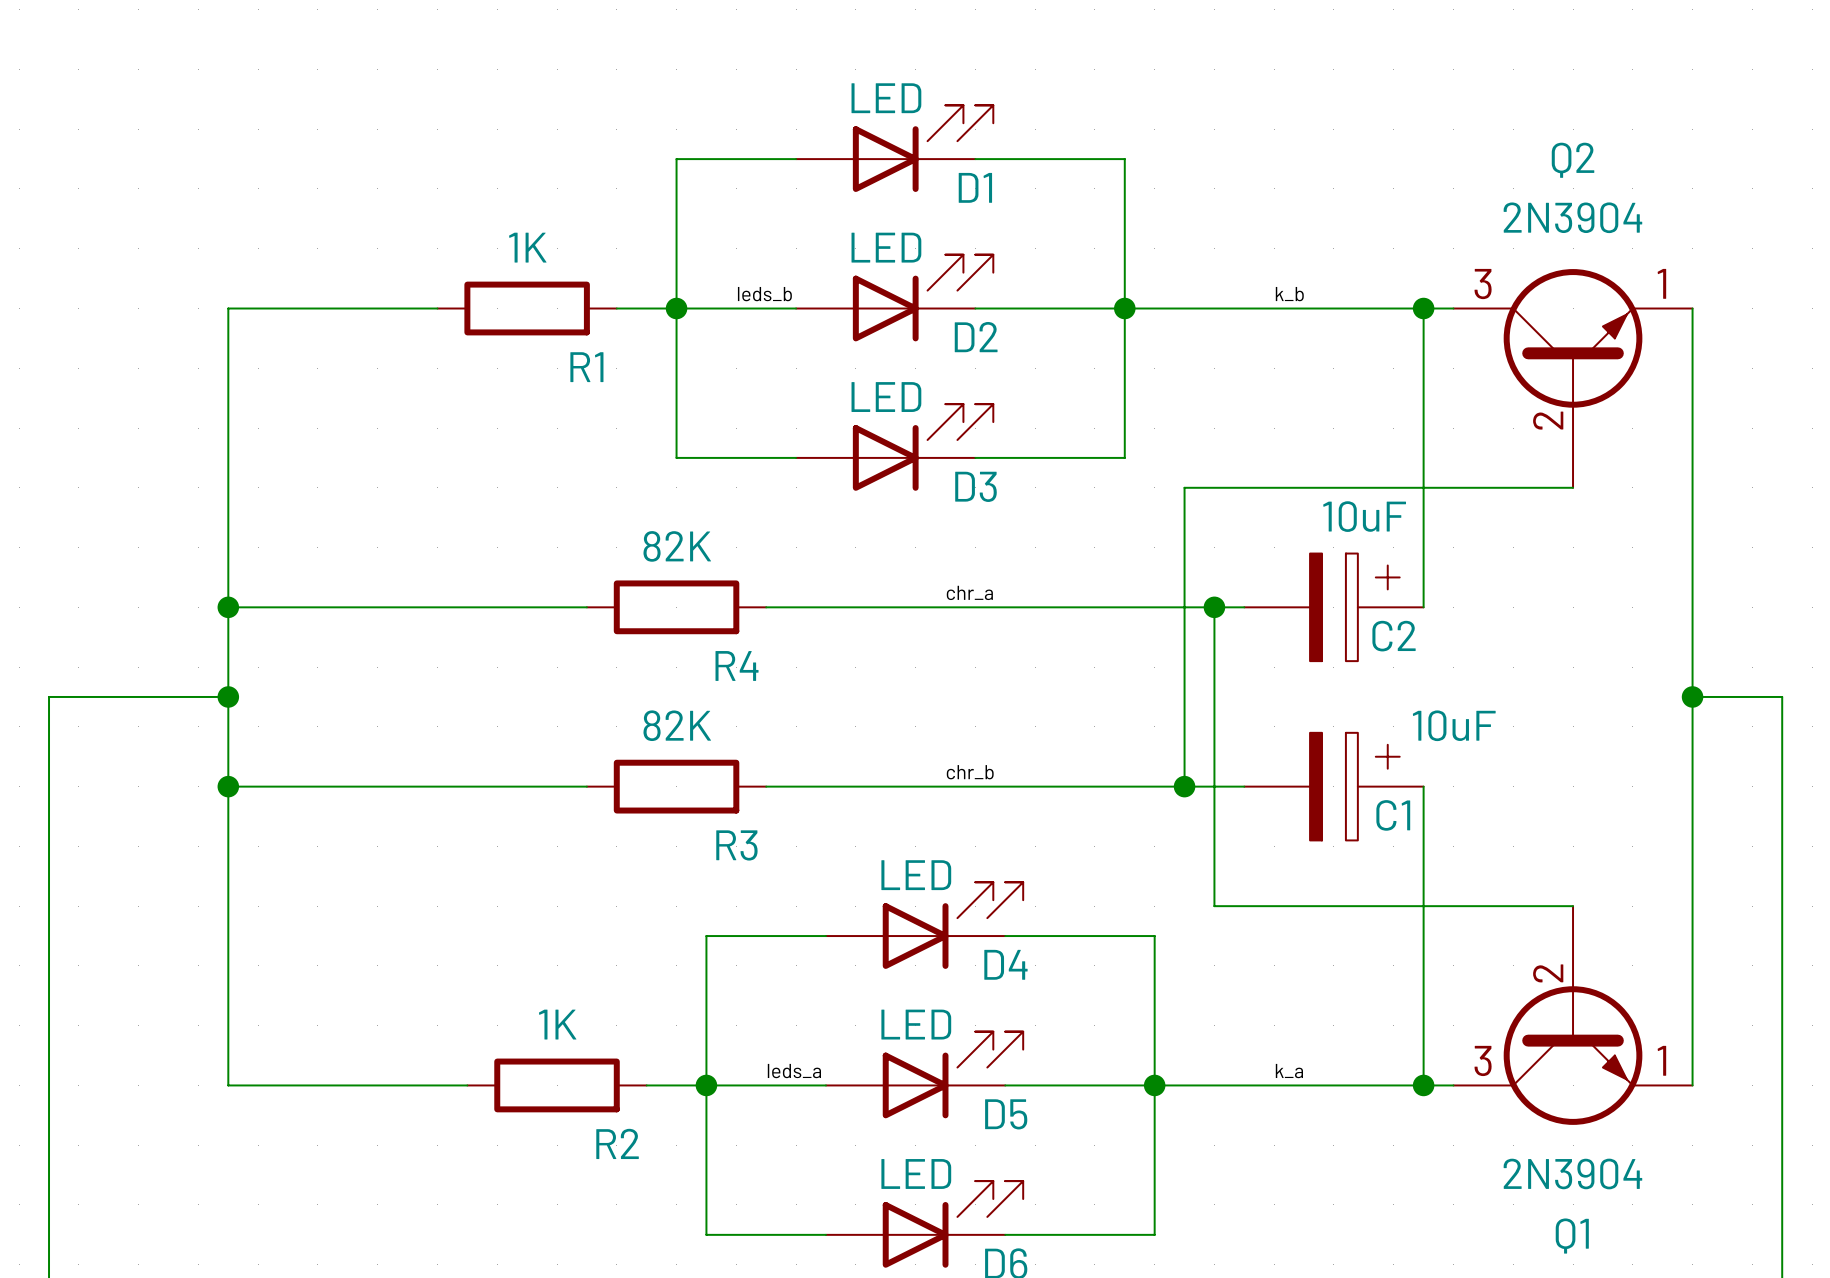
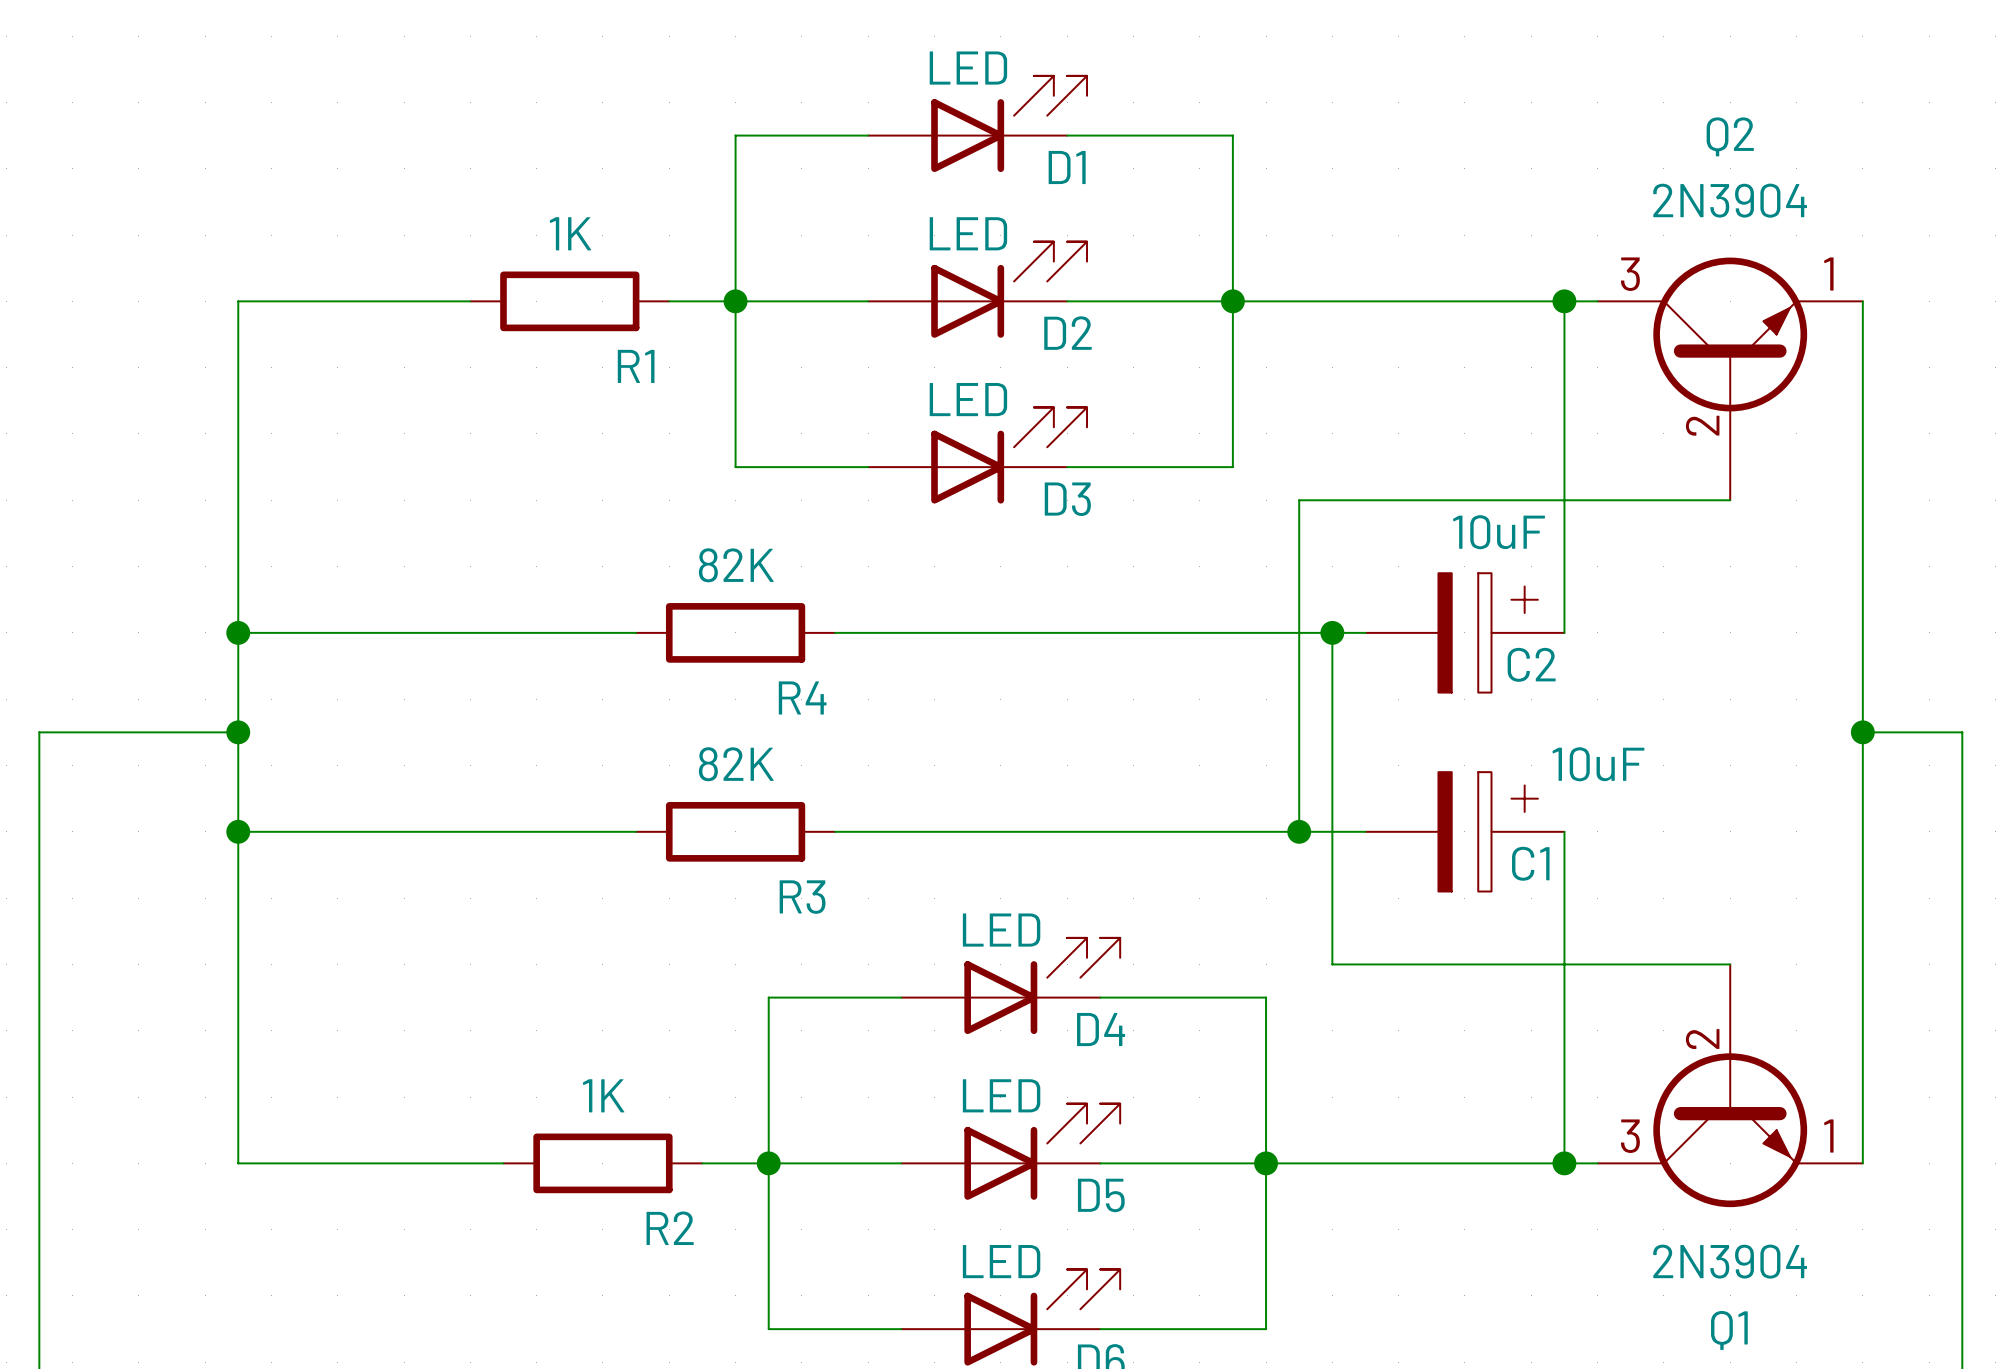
label: leds_b (764, 294) -> none
label: k_b (1289, 294) -> none
label: chr_a (969, 592) -> none
label: chr_b (970, 772) -> none
label: leds_a (794, 1071) -> none
label: k_a (1289, 1071) -> none

